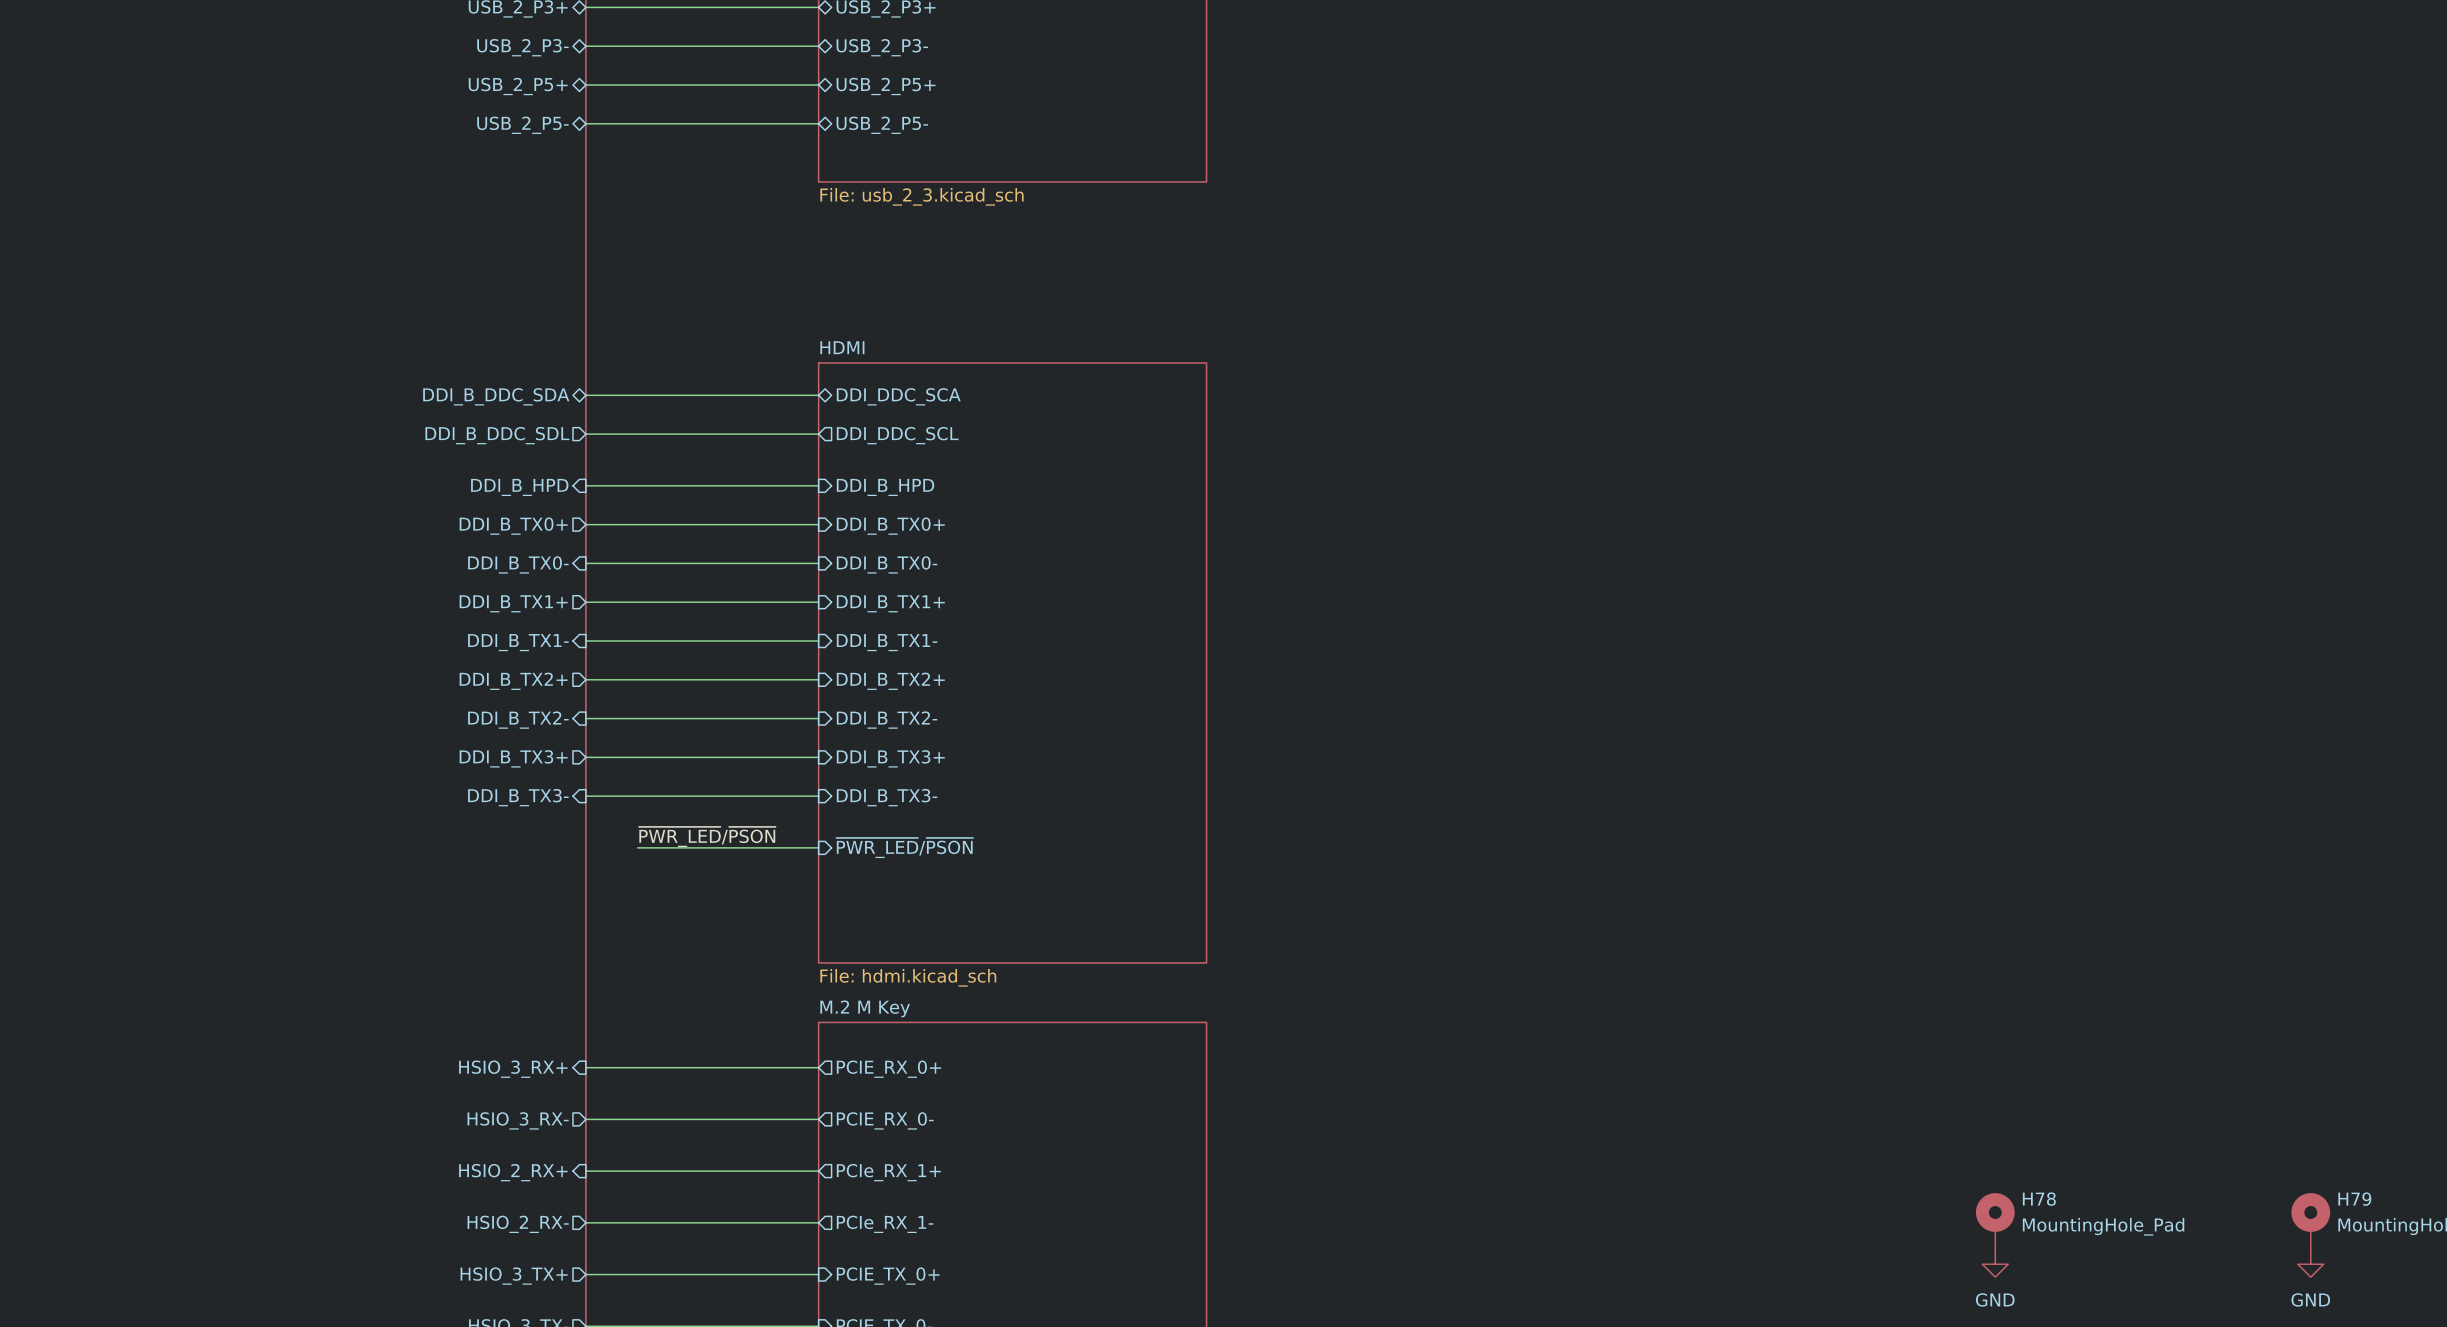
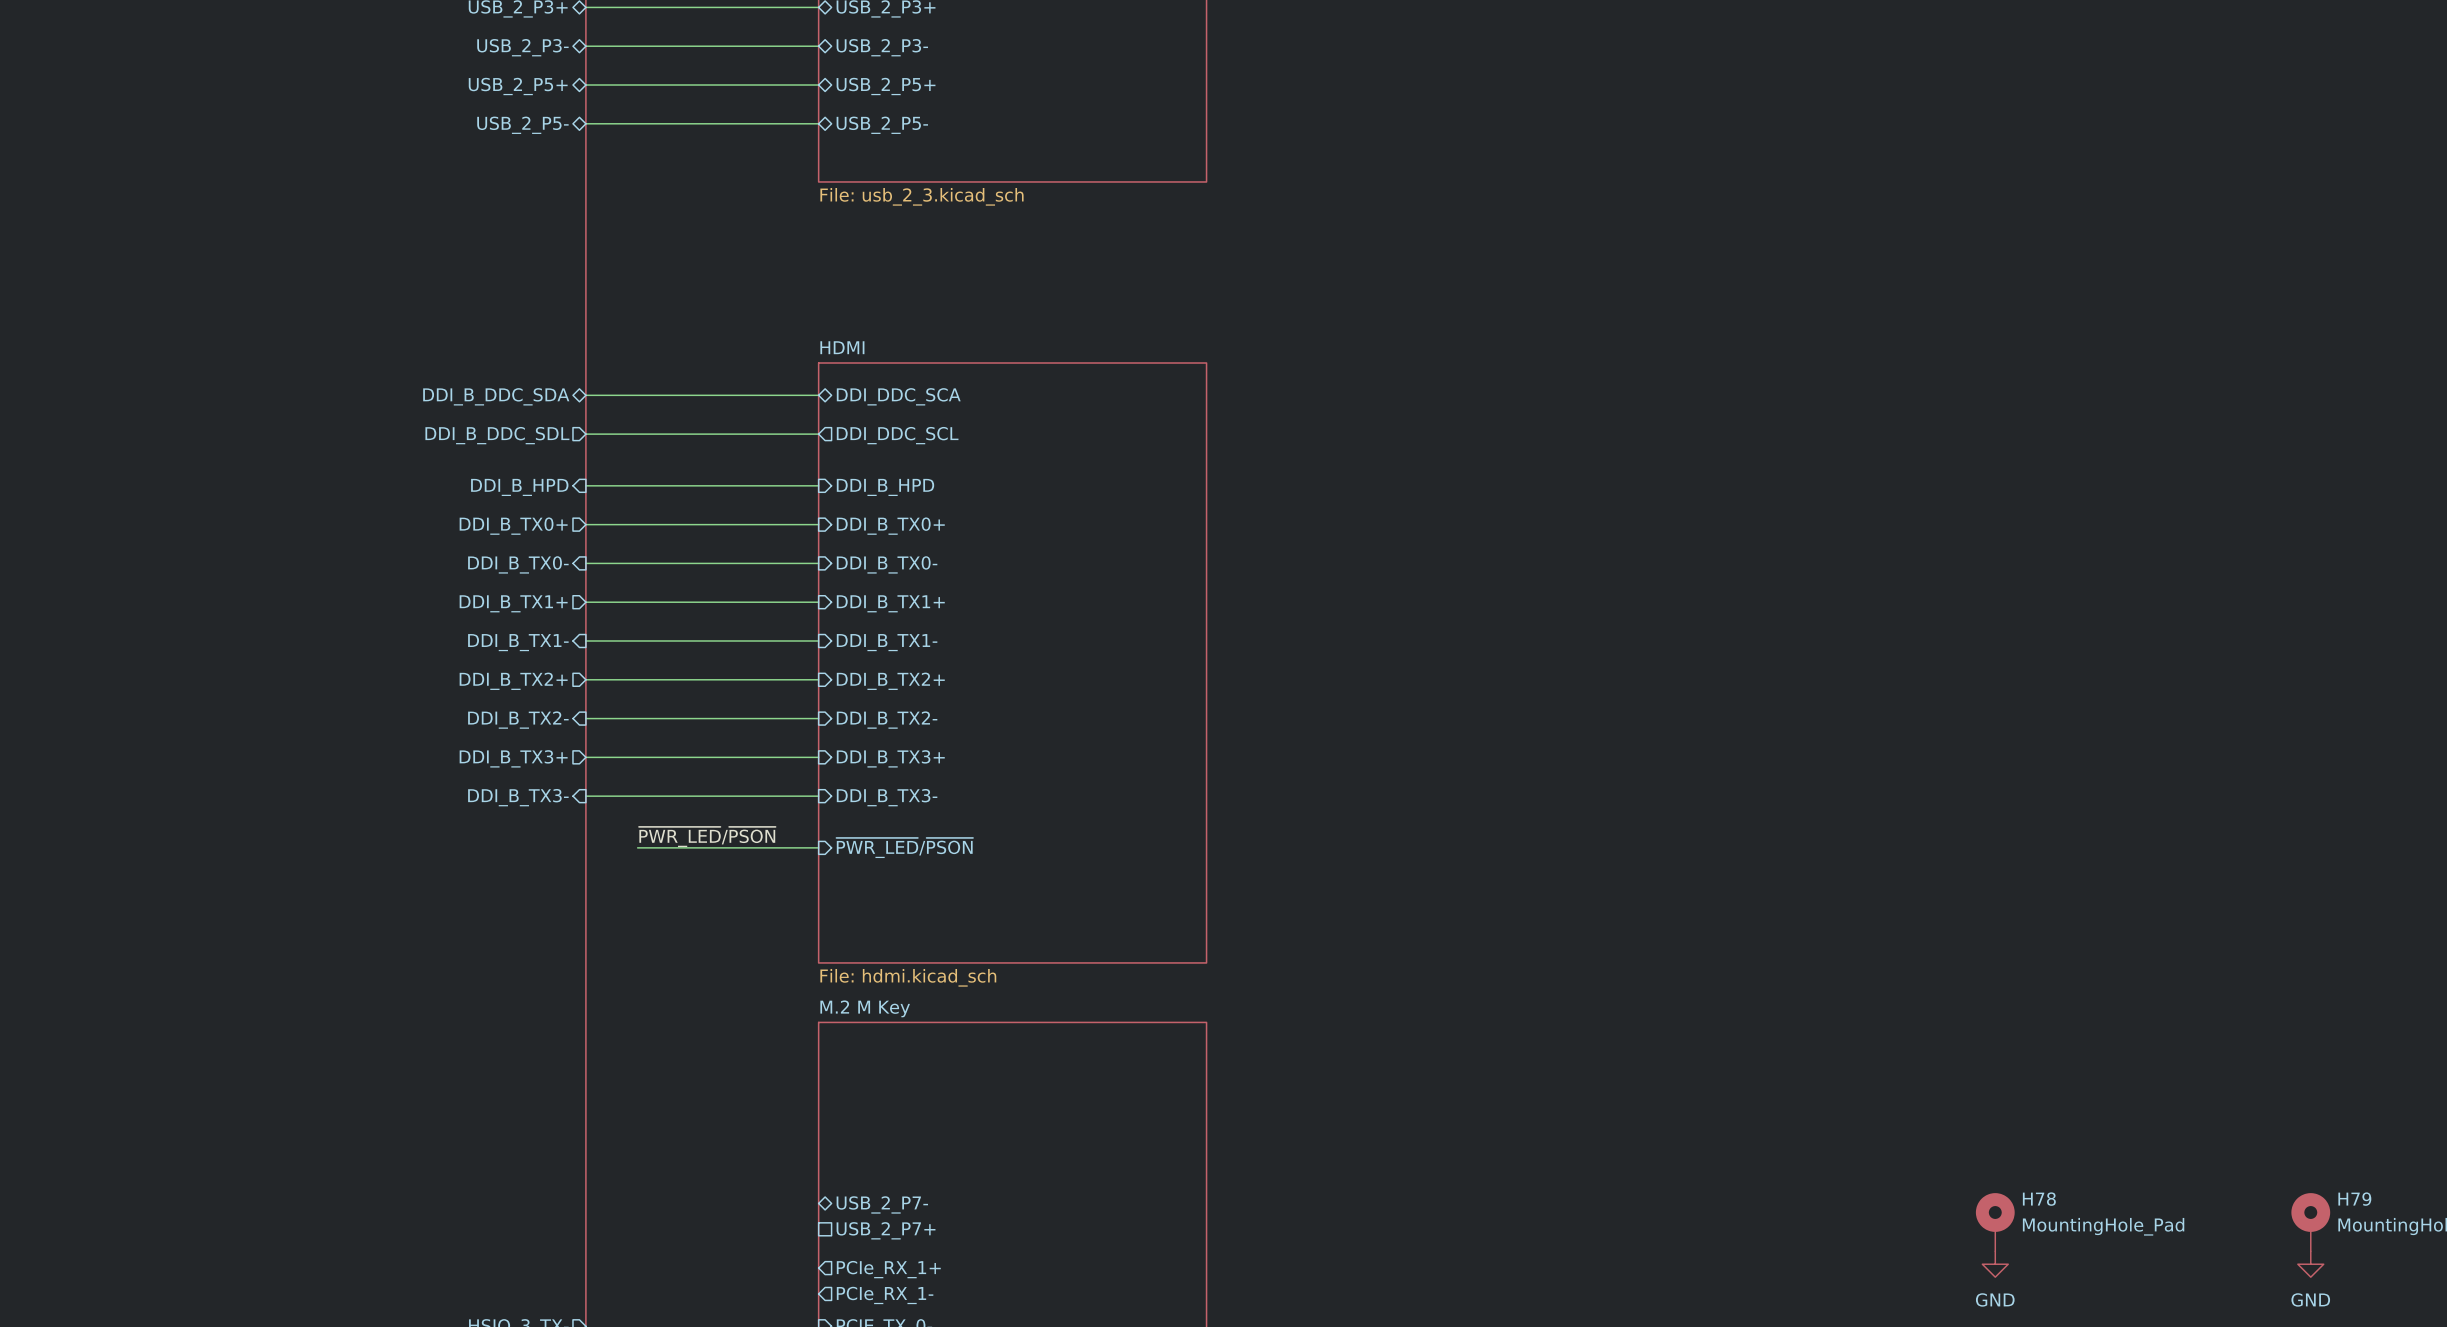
wire: (585, 1067) (818, 1067) -> none
sheet pin: HSIO_3_RX+ (513, 1069) -> none
sheet pin: PCIE_RX_0+ (888, 1069) -> none
wire: (585, 1119) (818, 1119) -> none
sheet pin: HSIO_3_RX- (518, 1120) -> none
sheet pin: PCIE_RX_0- (885, 1120) -> none
wire: (585, 1171) (818, 1171) -> none
sheet pin: HSIO_2_RX+ (513, 1172) -> none
sheet pin position: PCIe_RX_1+ (888, 1172) -> PCIe_RX_1+ (888, 1269)
sheet pin: none -> USB_2_P7- (882, 1204)
wire: (585, 1222) (818, 1222) -> none
sheet pin: HSIO_2_RX- (518, 1224) -> none
sheet pin position: PCIe_RX_1- (885, 1224) -> PCIe_RX_1- (885, 1295)
sheet pin: none -> USB_2_P7+ (886, 1230)
wire: (585, 1274) (818, 1274) -> none
sheet pin: HSIO_3_TX+ (514, 1276) -> none
sheet pin: PCIE_TX_0+ (888, 1276) -> none
wire: (585, 1326) (818, 1326) -> none

